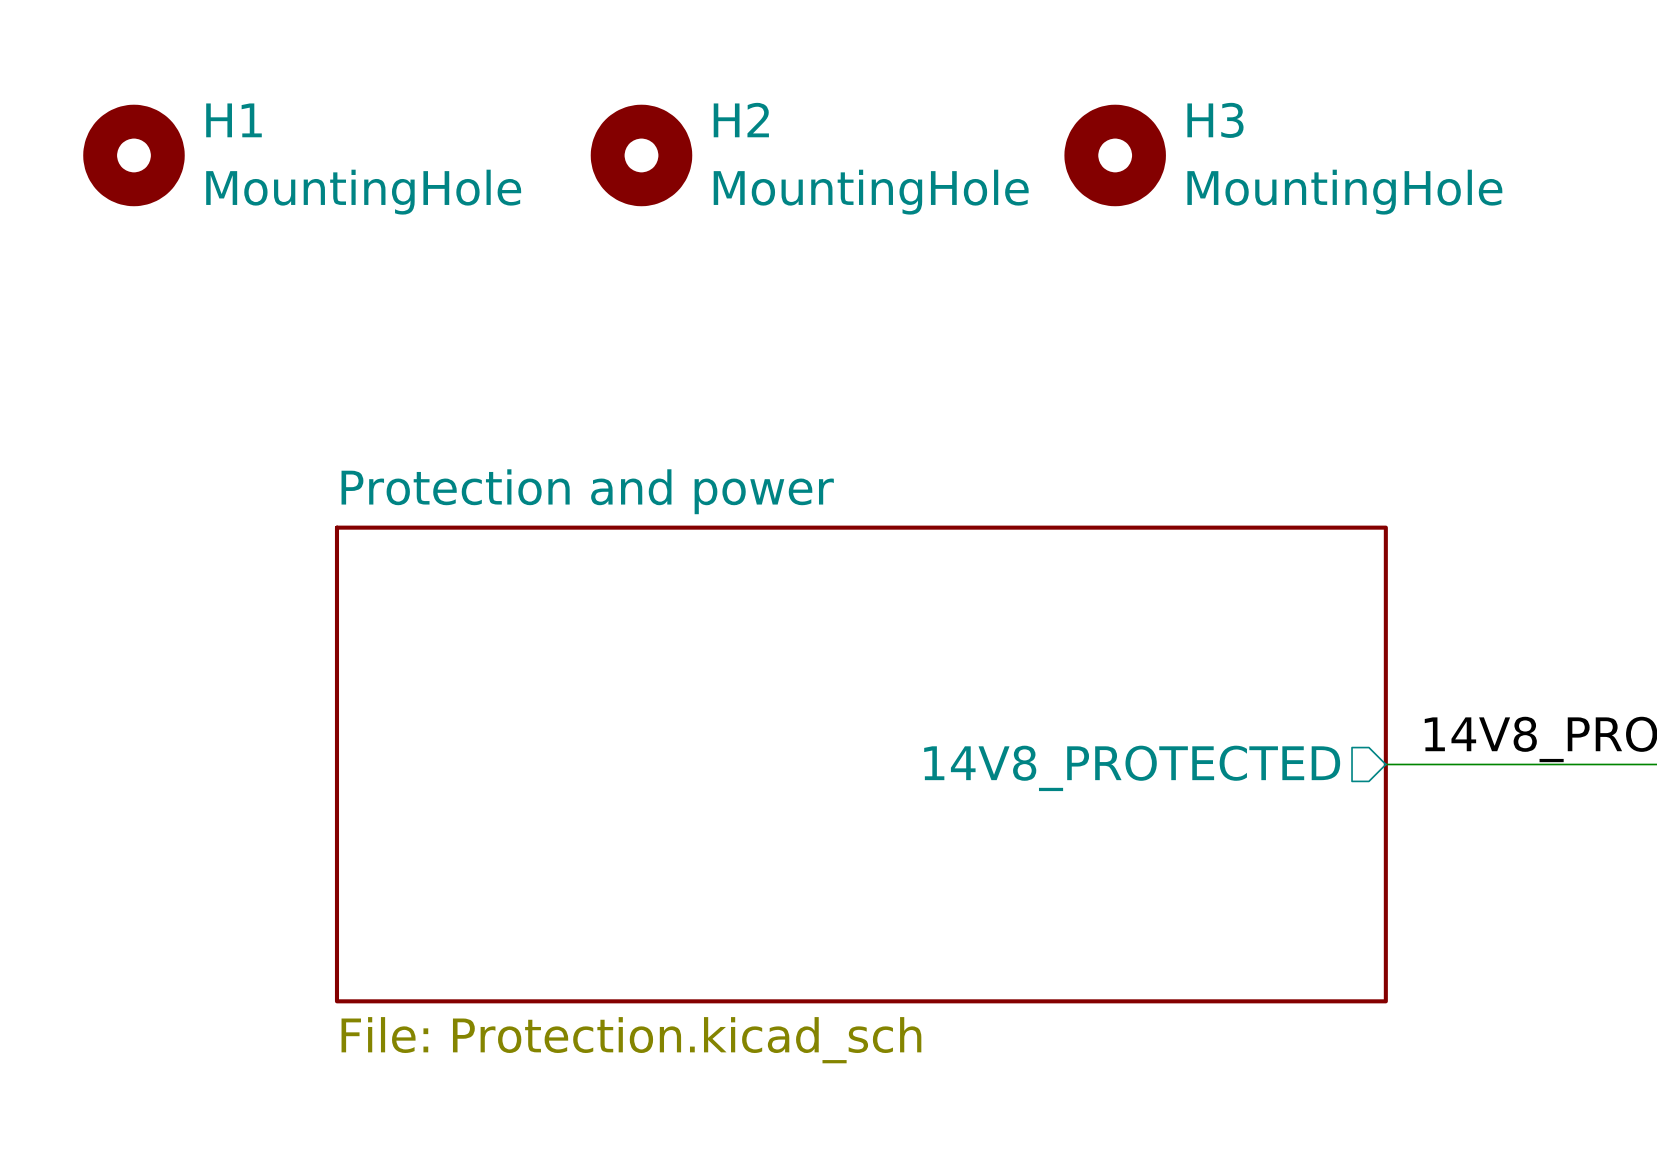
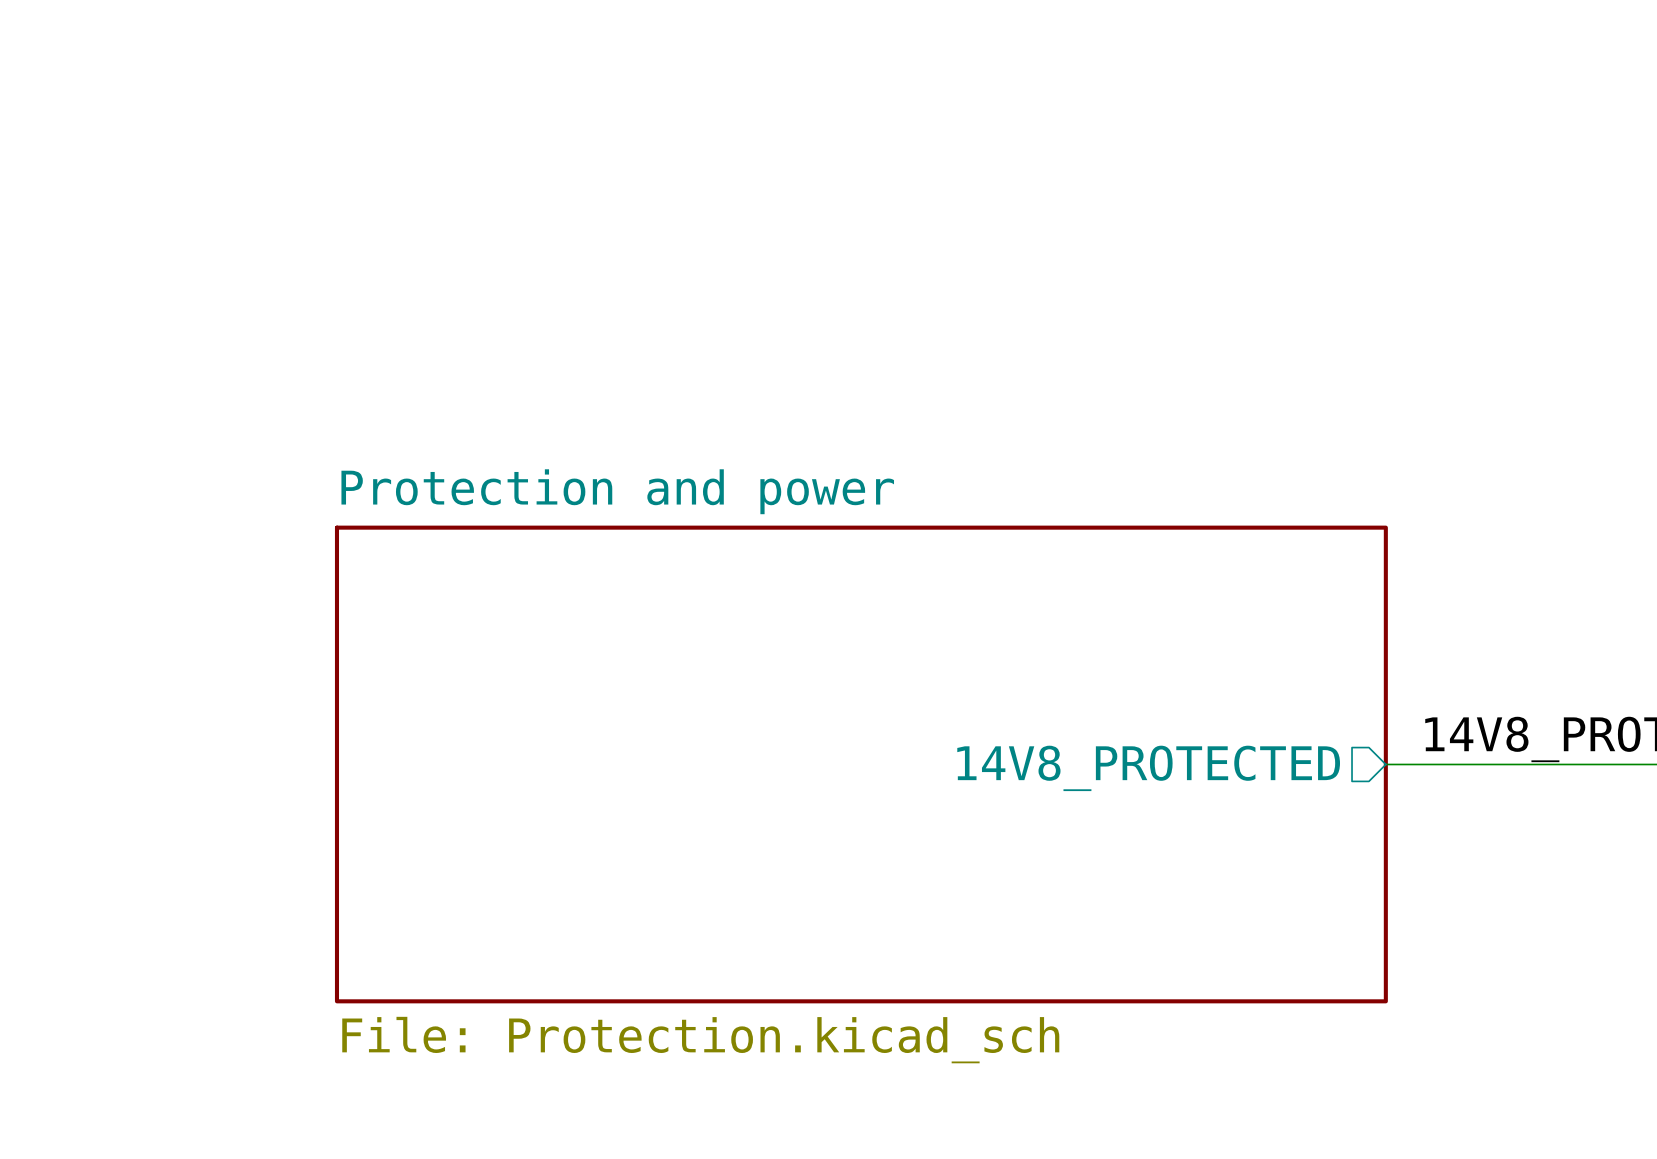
H1: MountingHole (133, 155) -> none
H2: MountingHole (641, 155) -> none
H3: MountingHole (1115, 155) -> none

